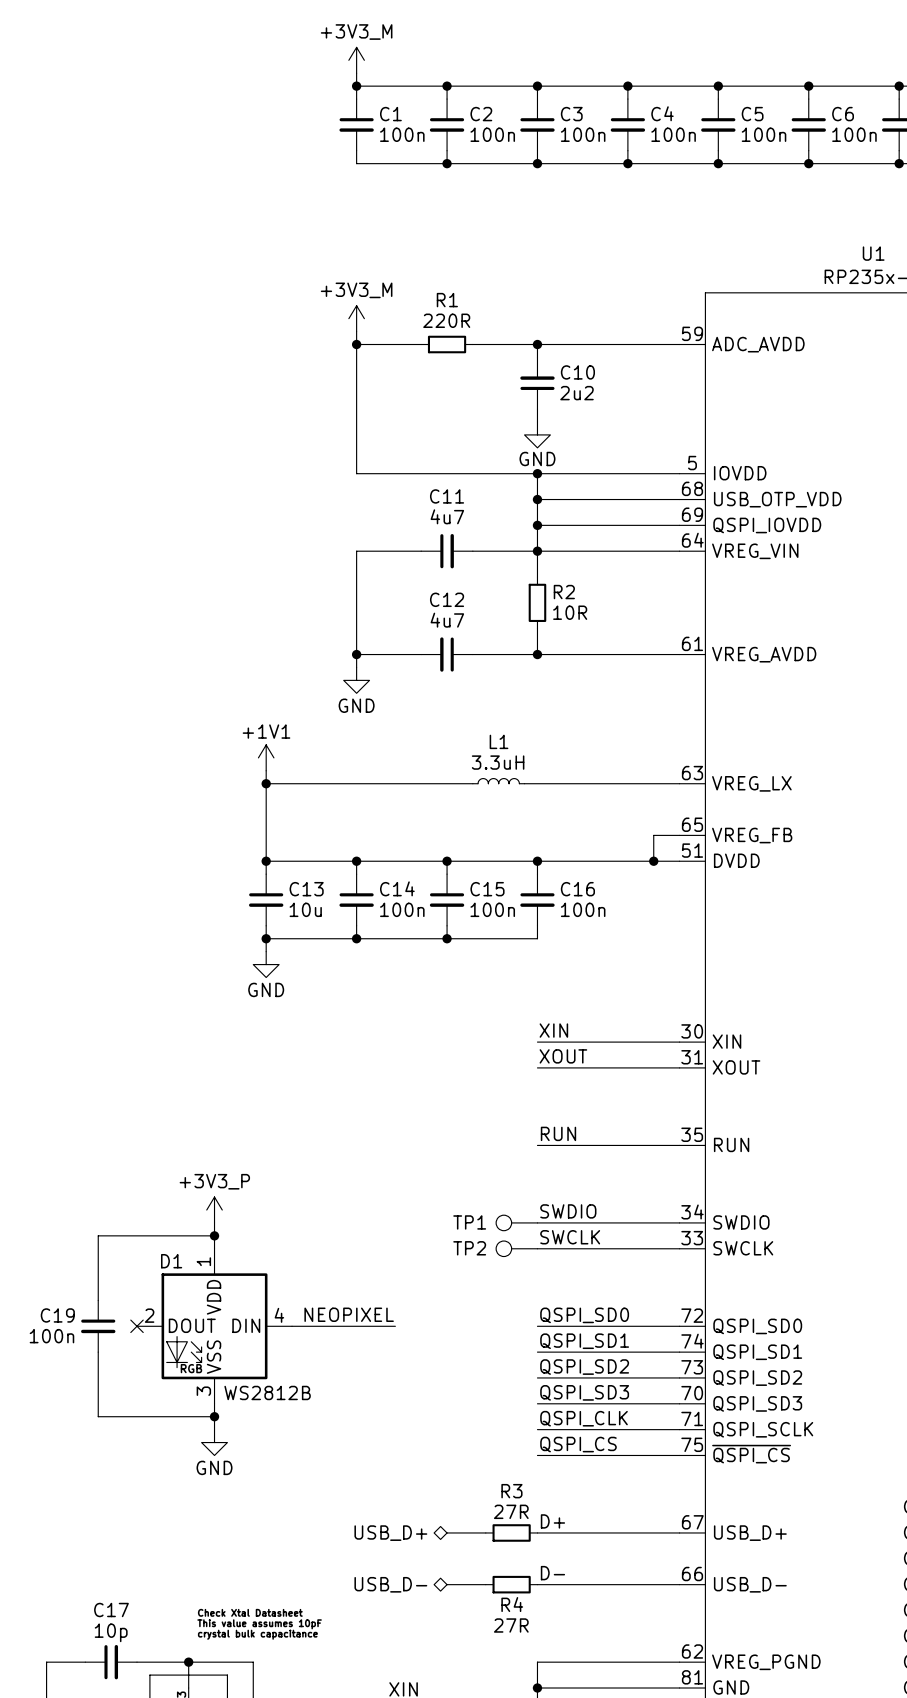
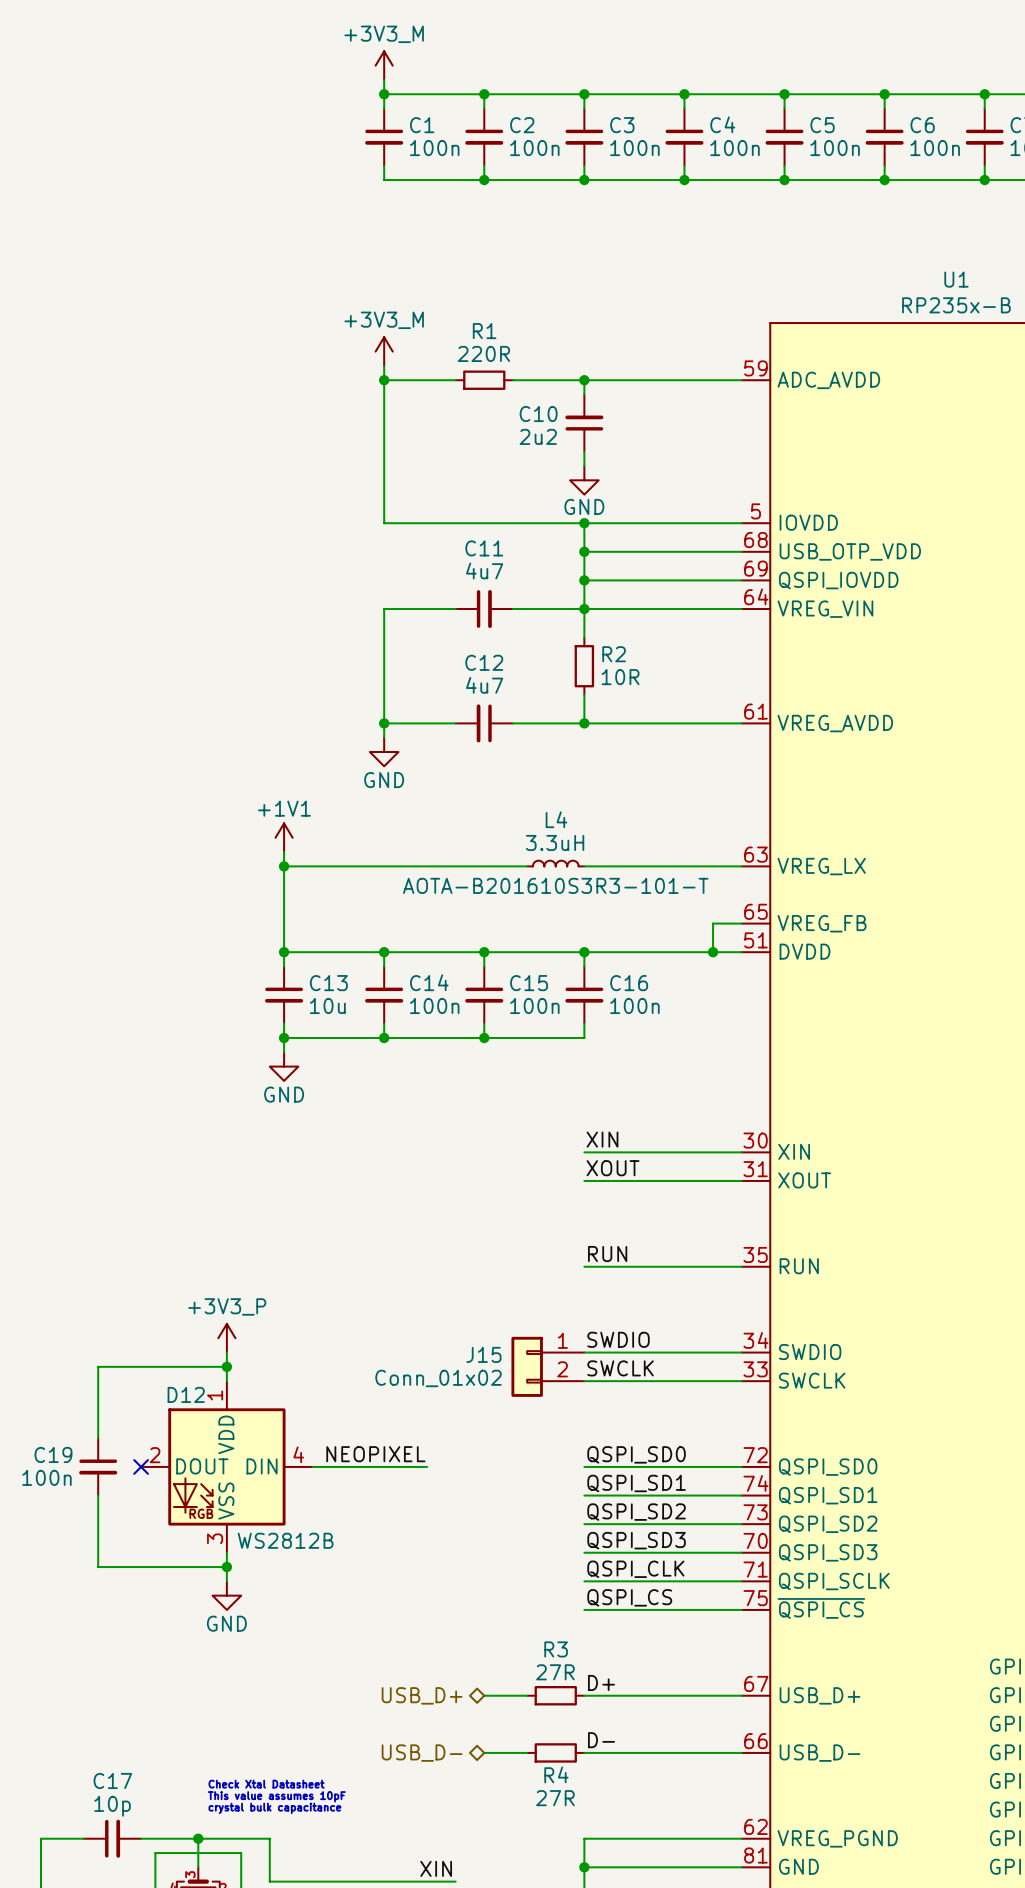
C10 name position: C10 (577, 372) -> C10 (538, 414)
C10 value position: 2u2 (577, 393) -> 2u2 (538, 436)
L1: 3.3uH (498, 781) -> none
L4: none -> 3.3uH (555, 863)
wire: (524, 783) (537, 783) -> (512, 866) (527, 866)
TP1: (516, 1222) -> none
J15: none -> Conn_01x02 (547, 1366)
TP2: (516, 1248) -> none
D1 name: D1 (171, 1261) -> D12 (186, 1394)

